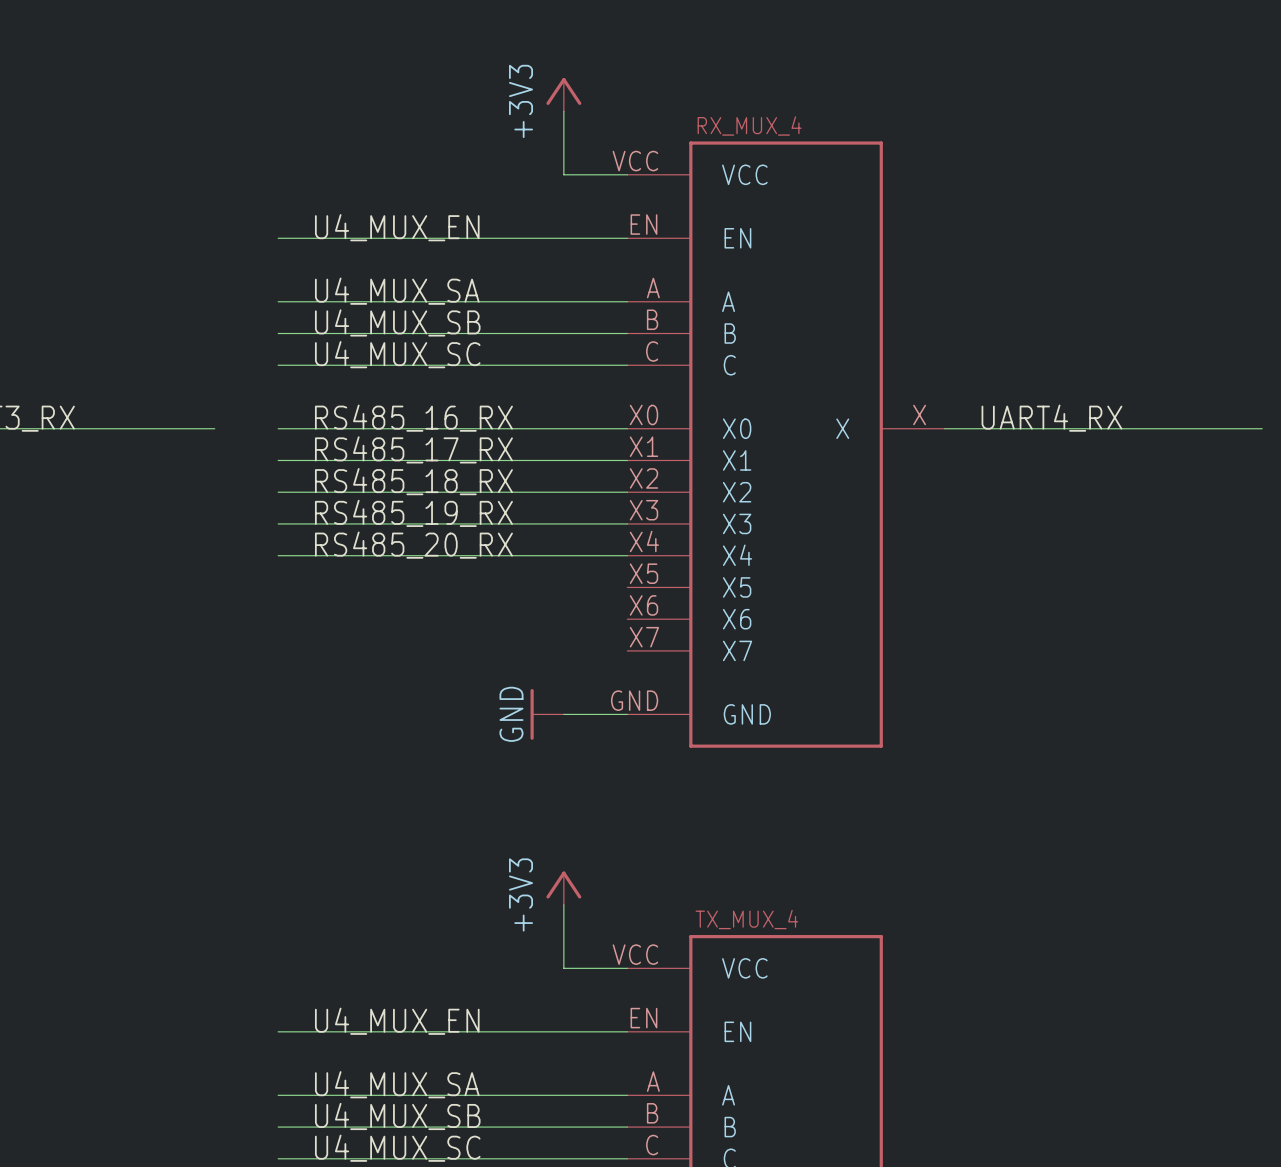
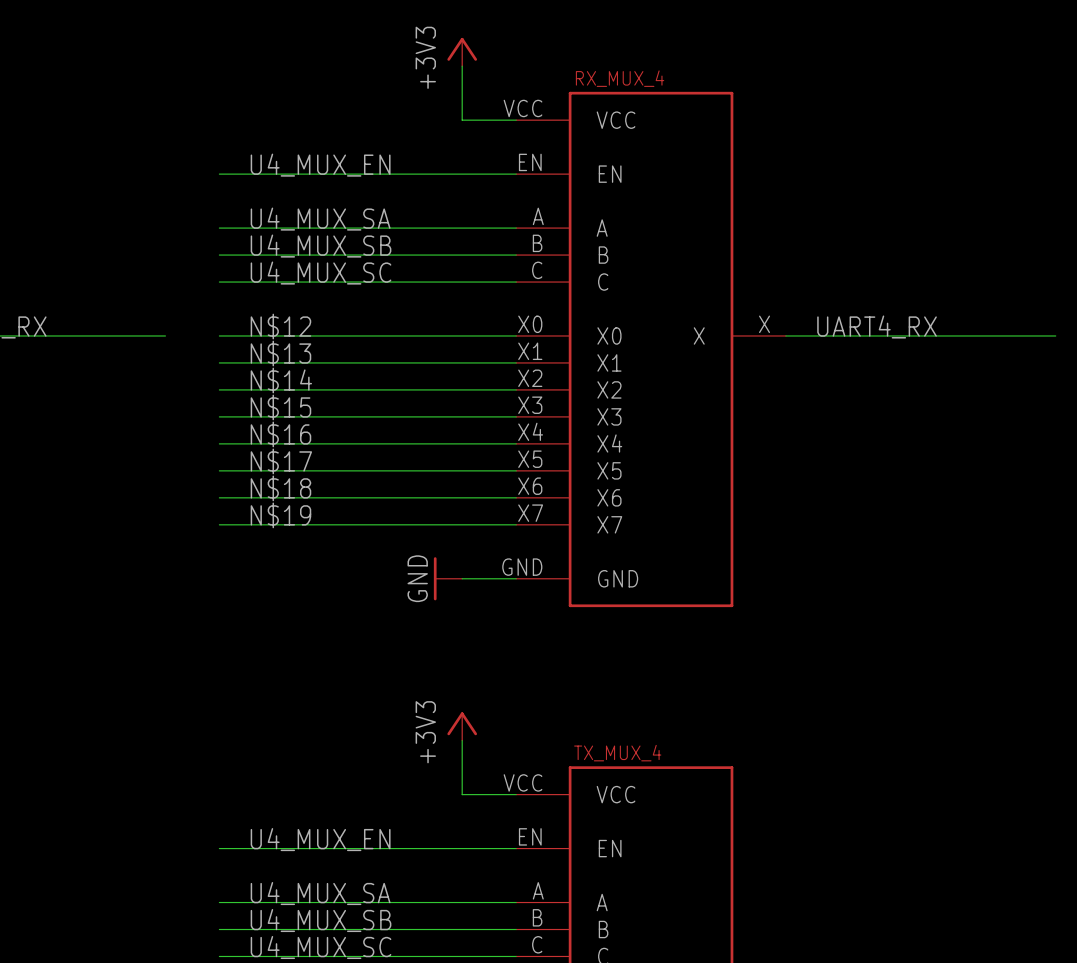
label: RS485_16_RX (413, 418) -> N$12 (280, 326)
label: RS485_17_RX (413, 449) -> N$13 (280, 353)
label: RS485_18_RX (413, 481) -> N$14 (281, 380)
label: RS485_19_RX (413, 513) -> N$15 (280, 407)
label: RS485_20_RX (413, 545) -> N$16 (280, 434)
label: none -> N$17 (281, 461)
wire: none -> (219, 470) (516, 470)
label: none -> N$18 (280, 488)
wire: none -> (219, 497) (516, 497)
label: none -> N$19 (280, 515)
wire: none -> (219, 524) (516, 524)

